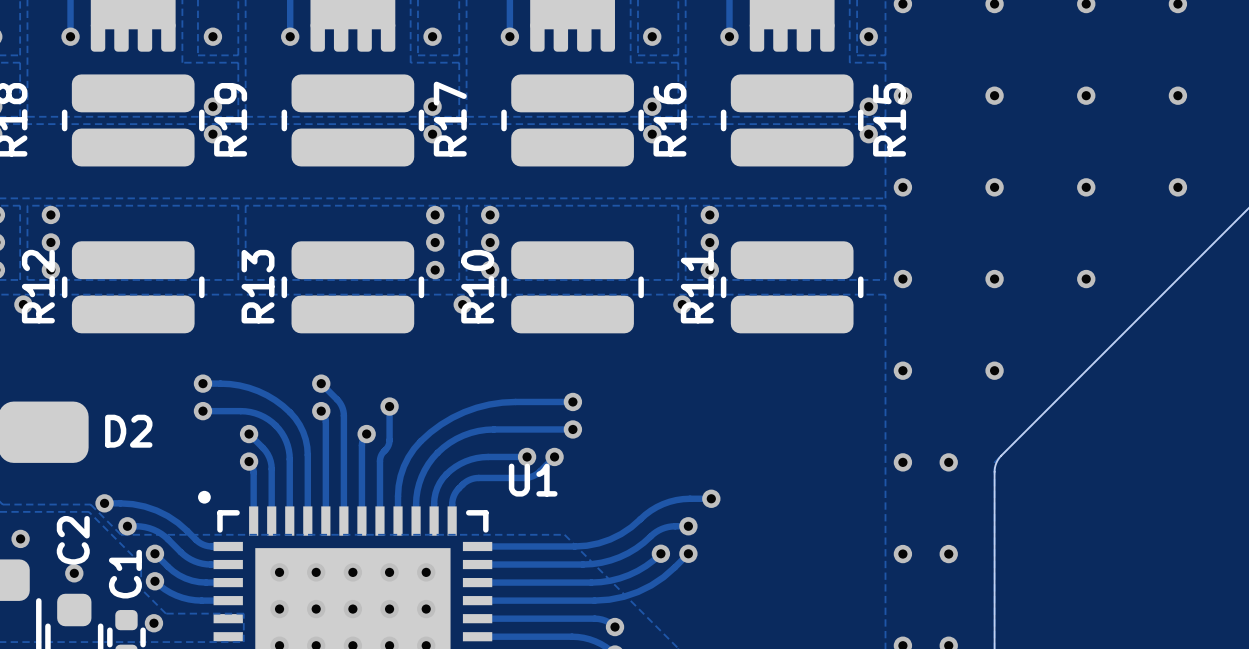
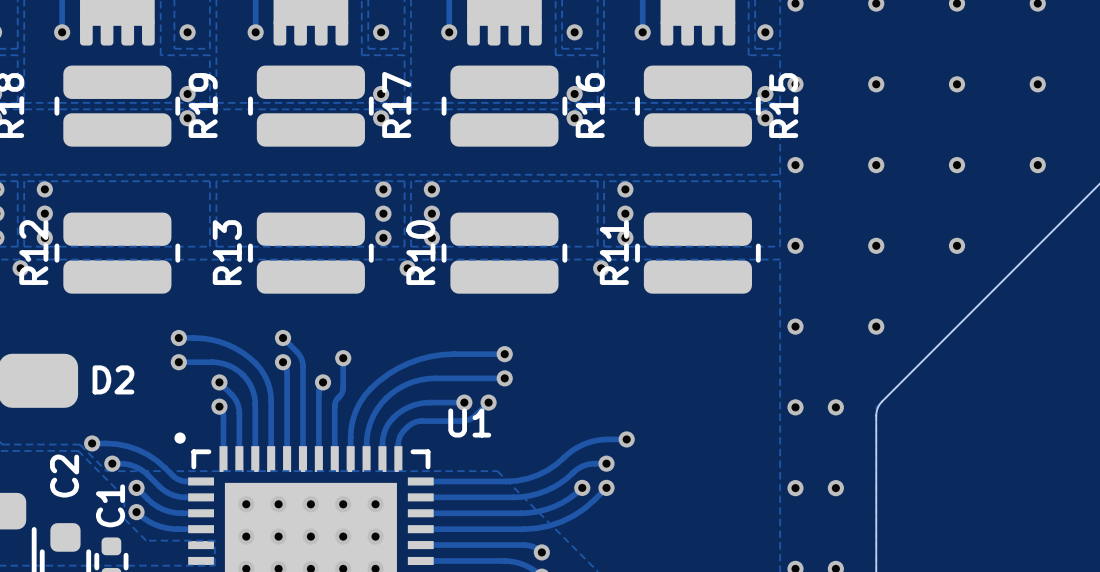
via: (20, 538) -> none
via: (74, 573) -> none
via: (153, 623) -> none

